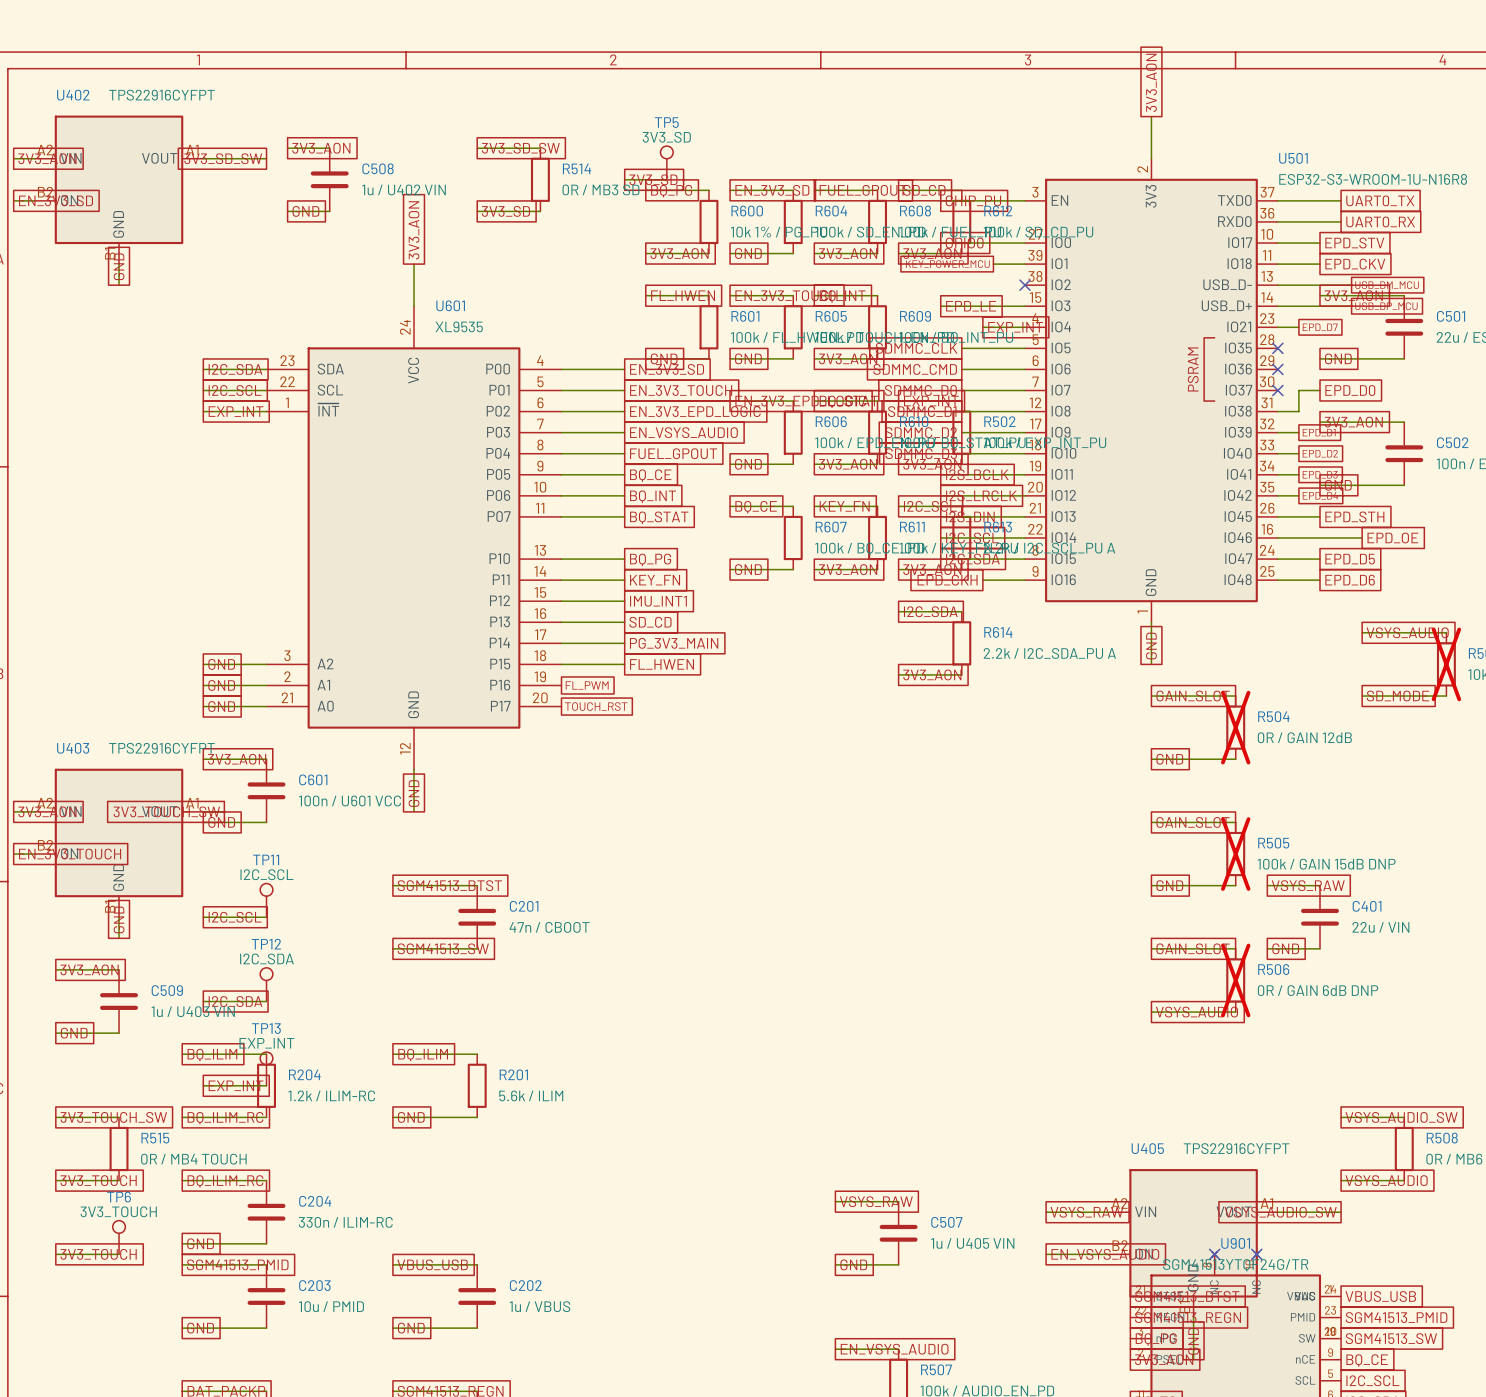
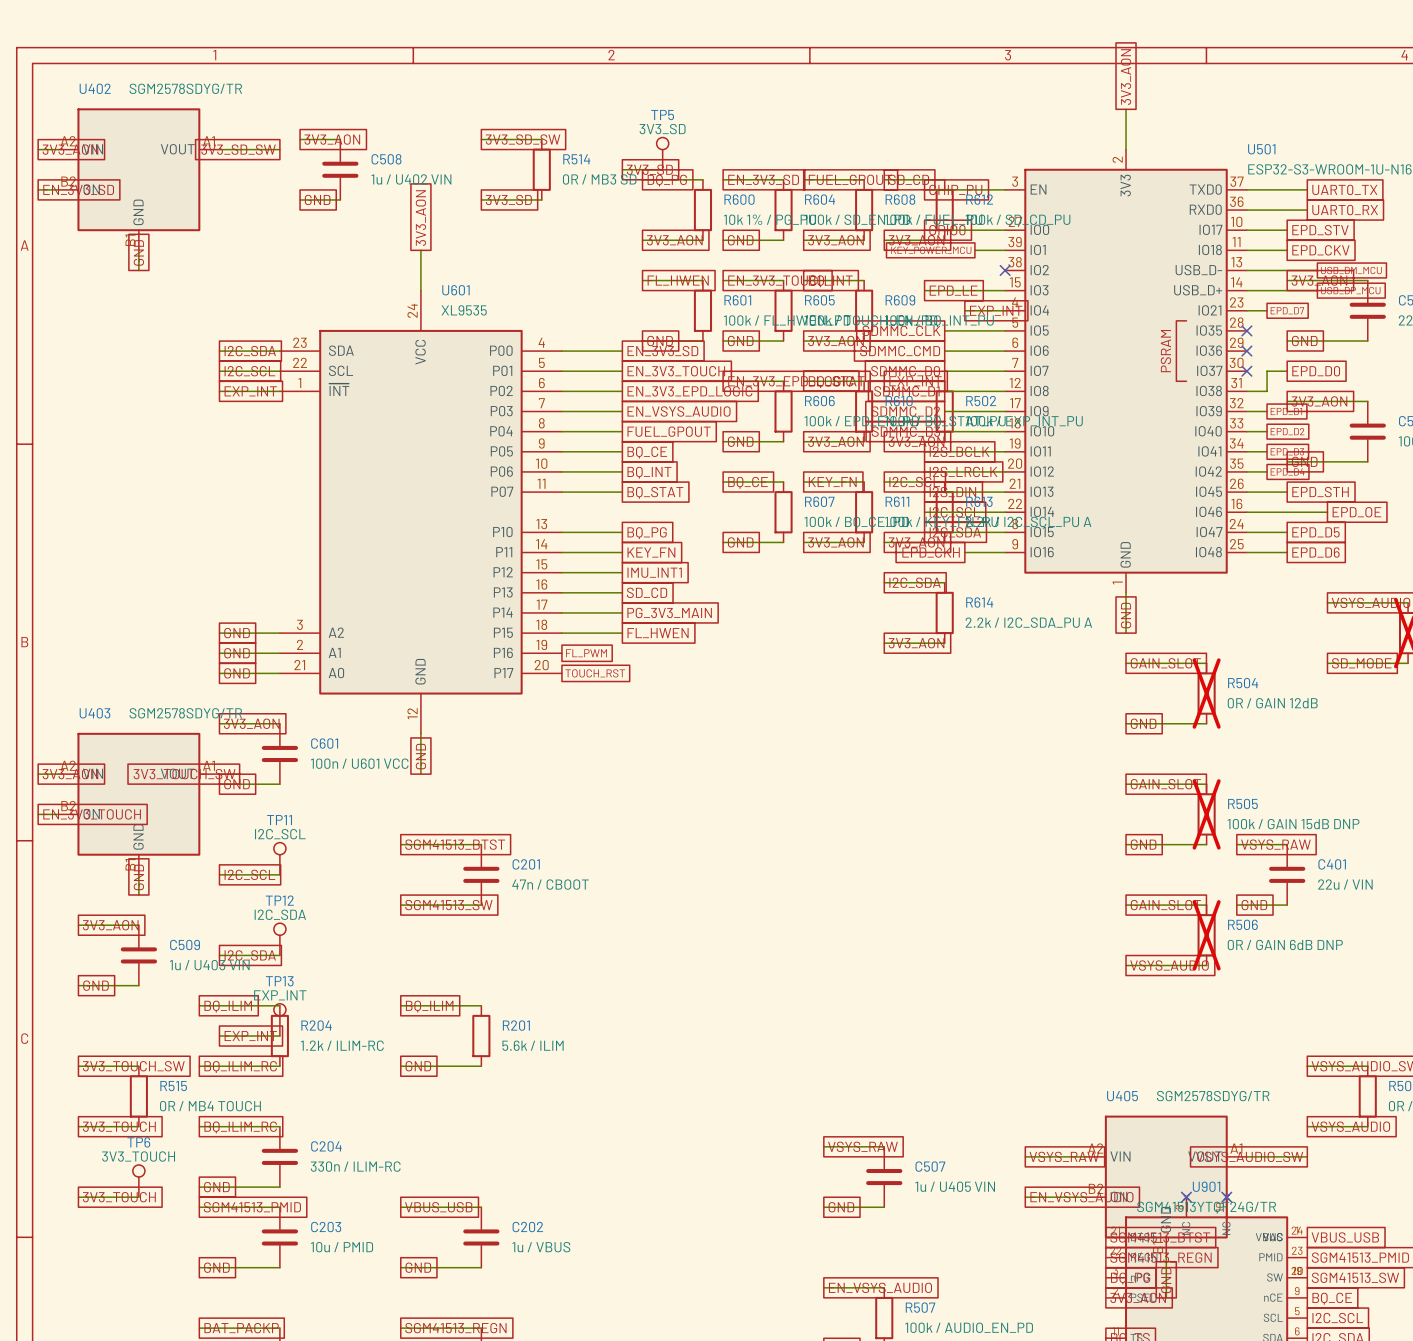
U402 value: TPS22916CYFPT (161, 95) -> SGM2578SDYG/TR (185, 88)
U403 value: TPS22916CYFPT (161, 748) -> SGM2578SDYG/TR (185, 713)
U405 value: TPS22916CYFPT (1236, 1148) -> SGM2578SDYG/TR (1213, 1096)

